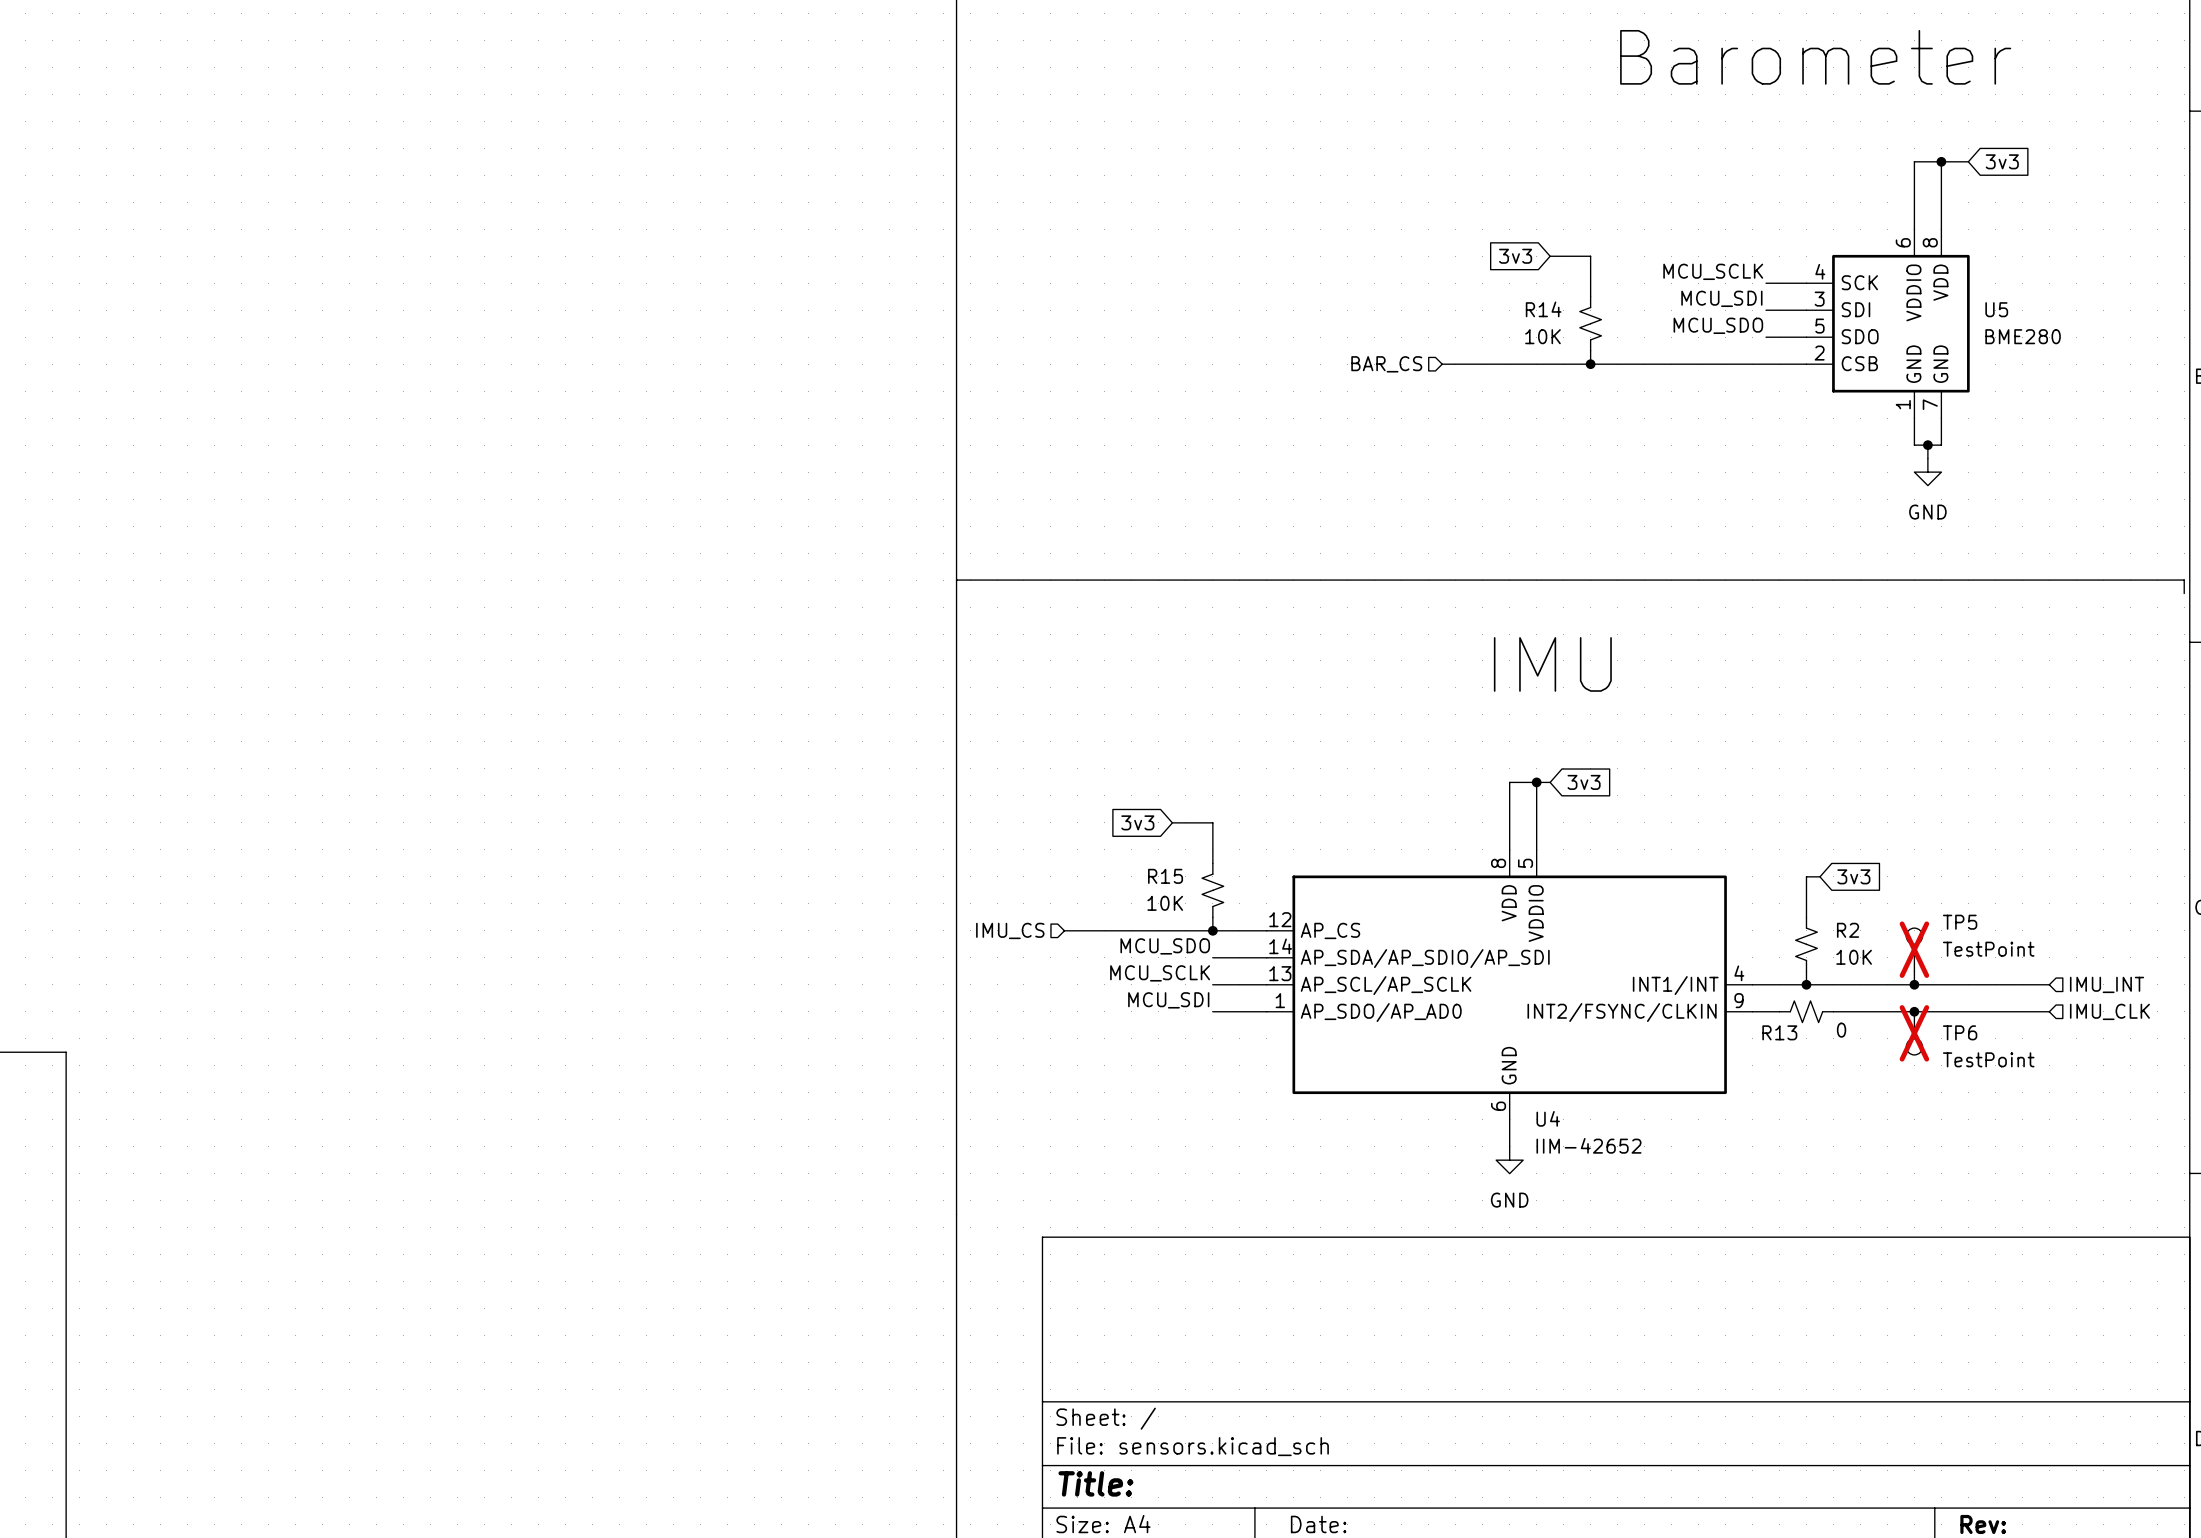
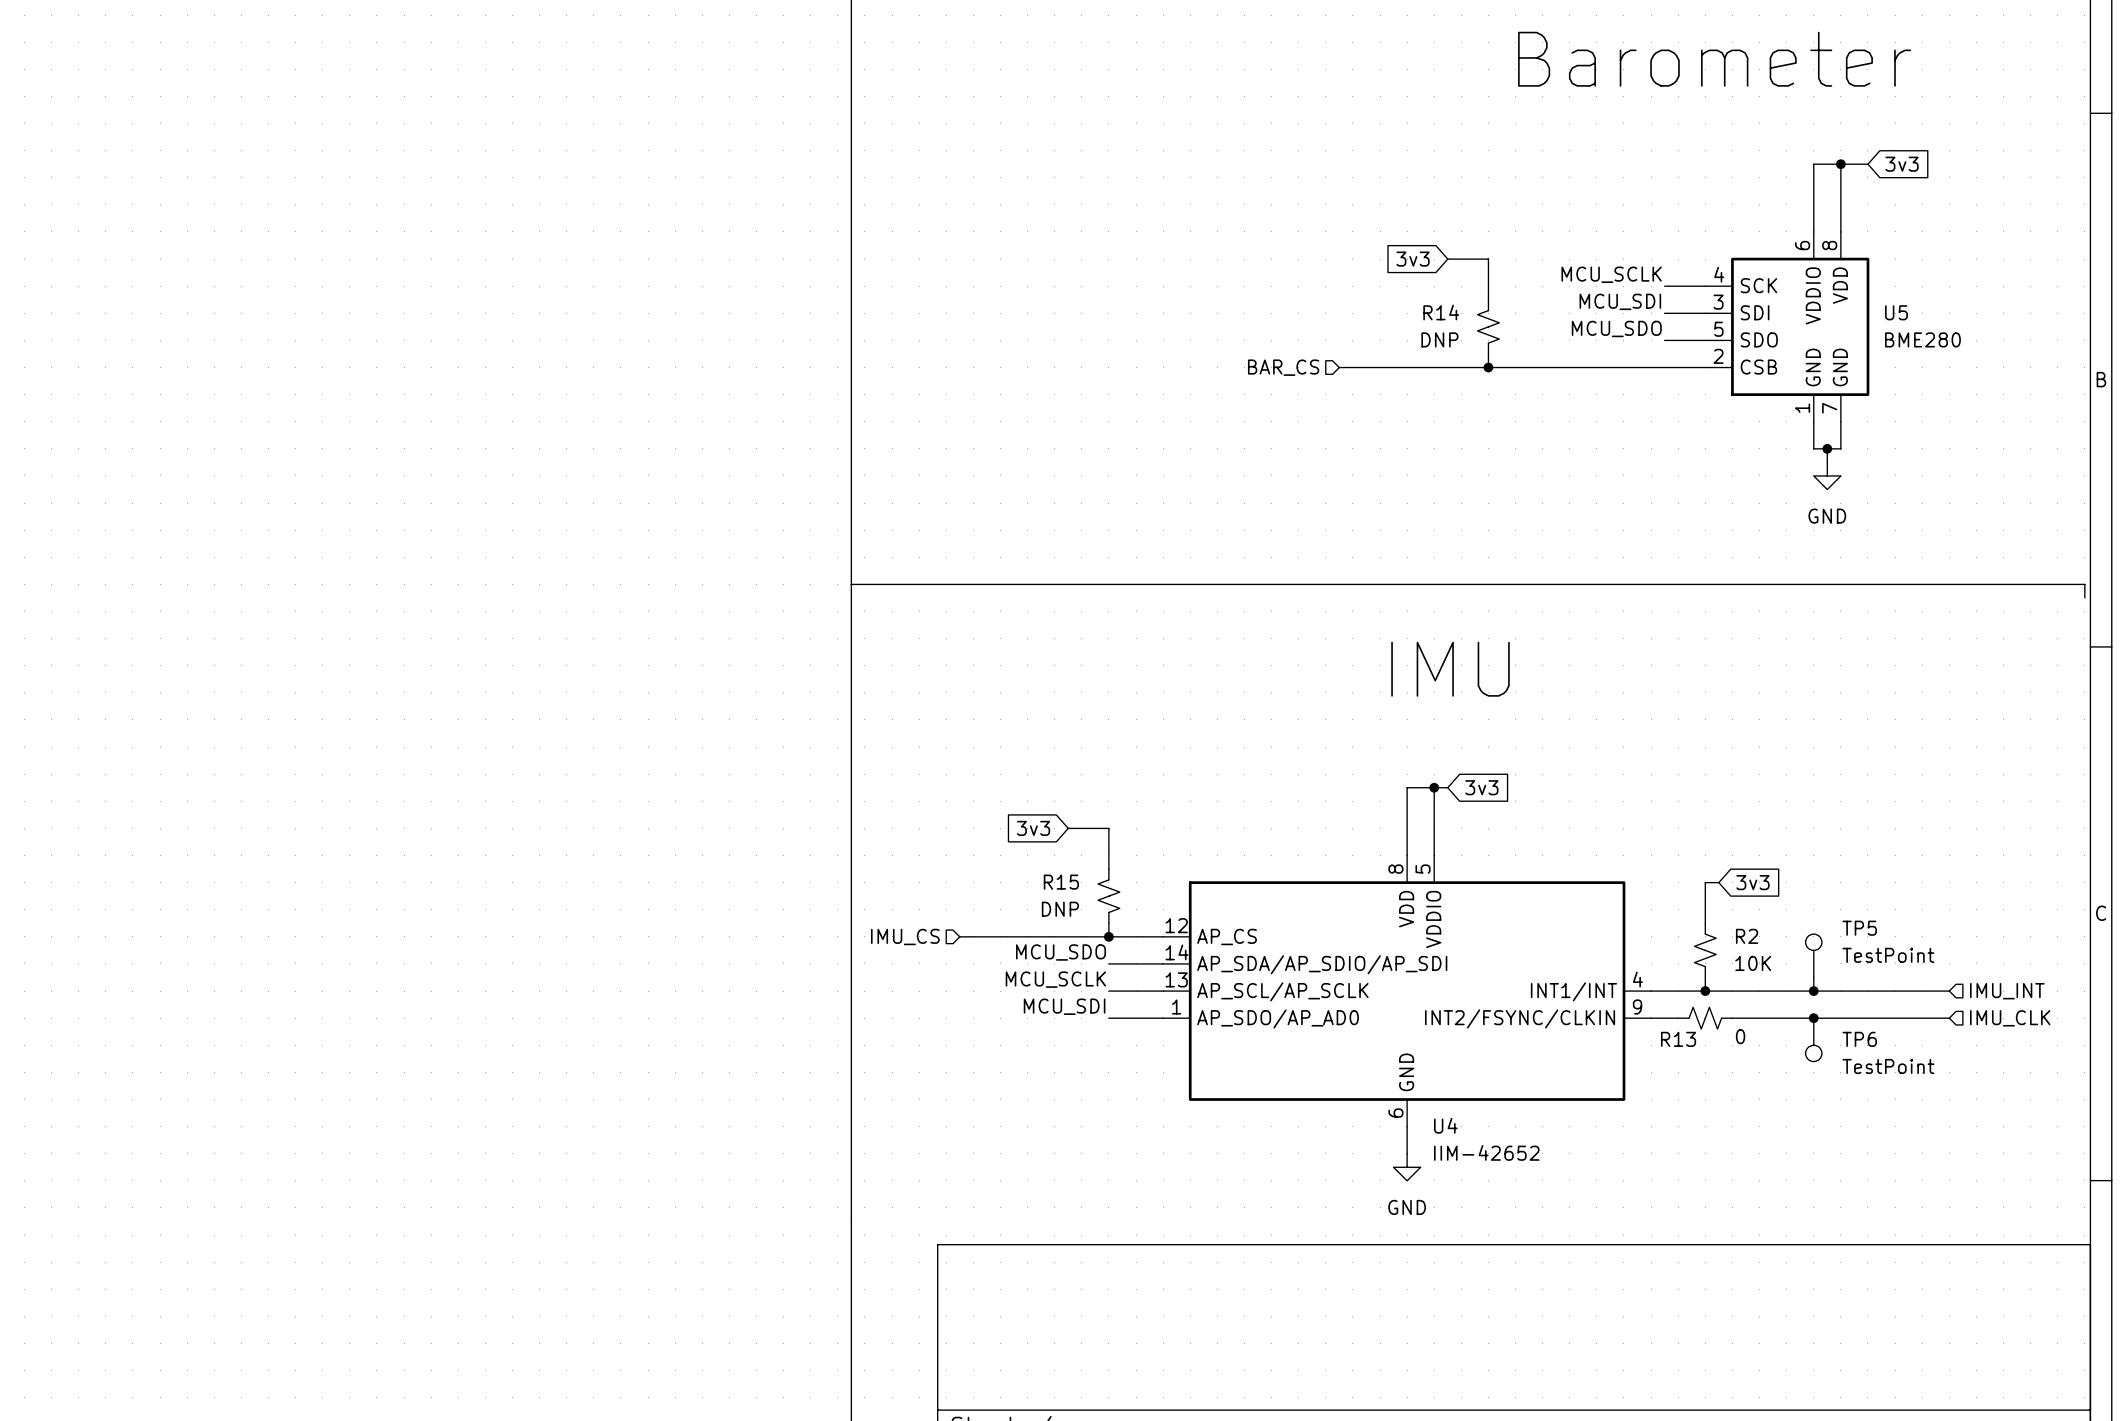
R14 value: 10K (1542, 336) -> DNP (1439, 339)
R15 value: 10K (1165, 903) -> DNP (1060, 909)
TP5 do-not-place cross: (1914, 949) -> none
TP6 do-not-place cross: (1914, 1033) -> none

